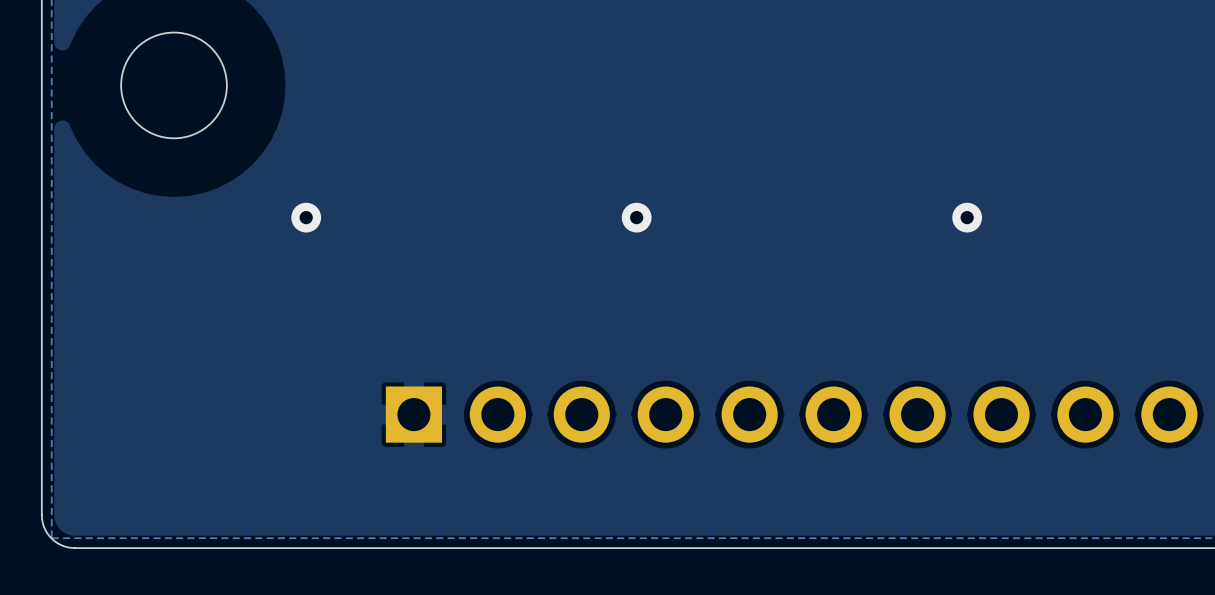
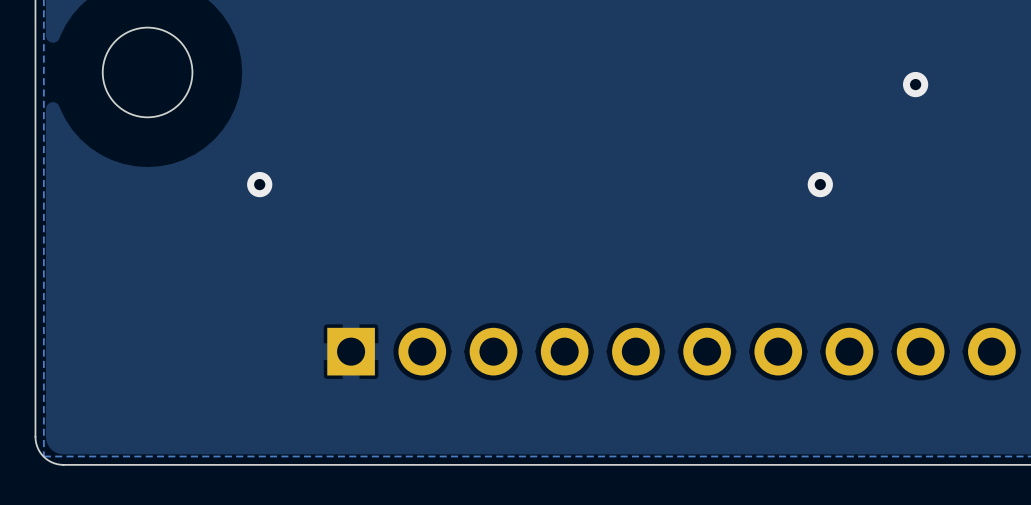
via: none -> (915, 84)
via: (636, 217) -> none

